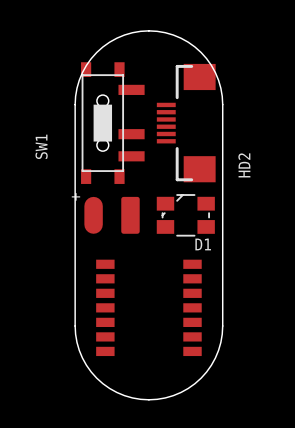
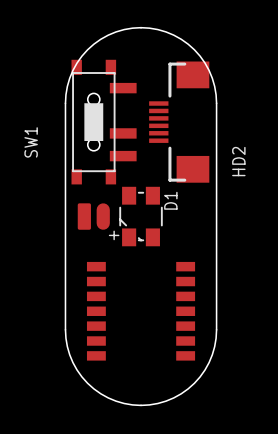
part footprint: [84, 196, 140, 234] -> [77, 203, 110, 230]
D1 rotation: 0° (185, 215) -> 90° counterclockwise (141, 216)
D1 position: (185, 215) -> (141, 216)

